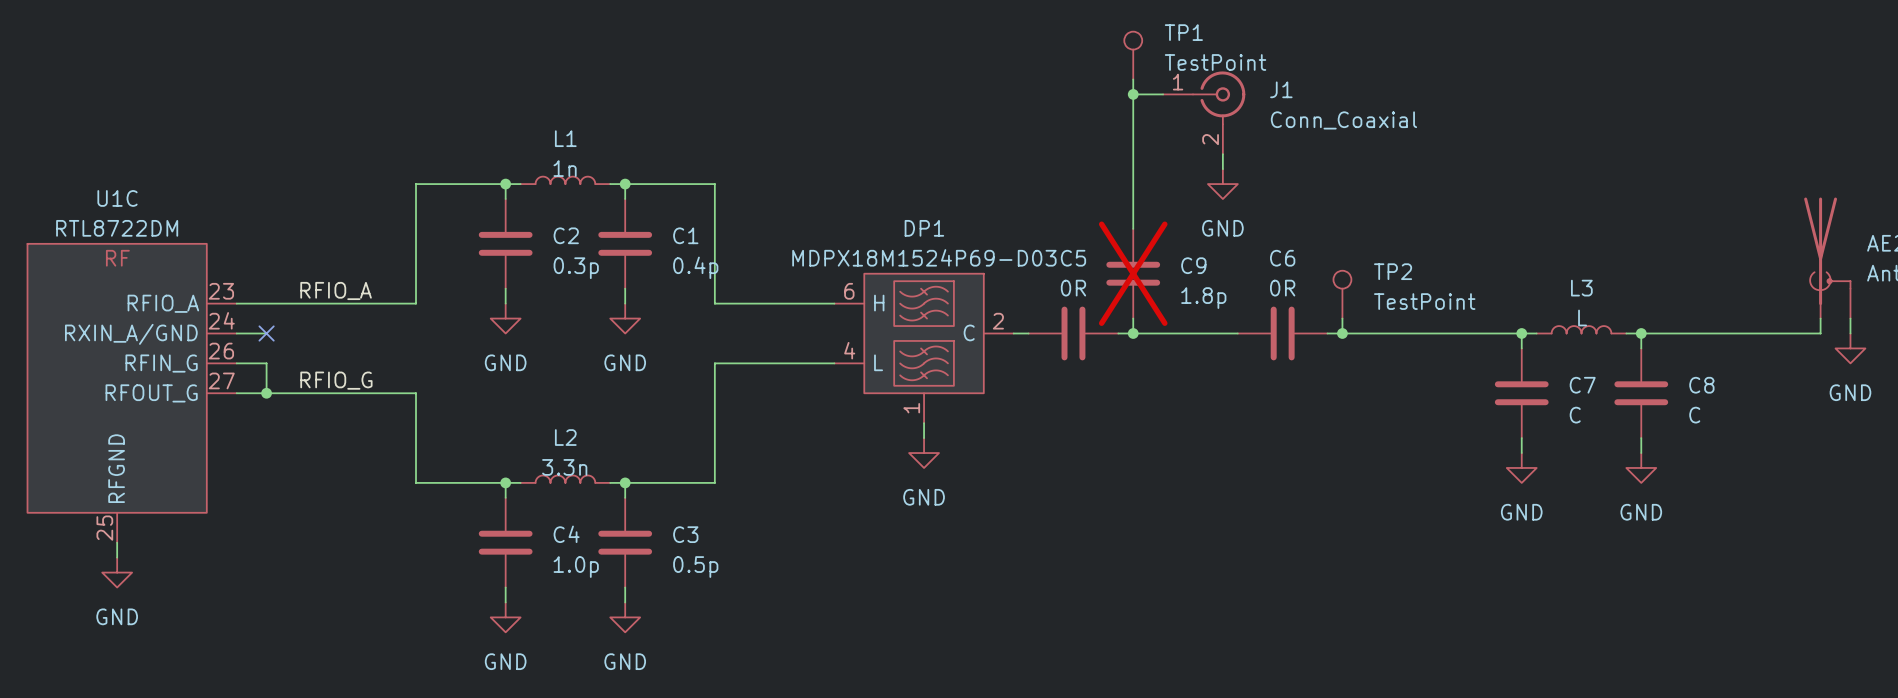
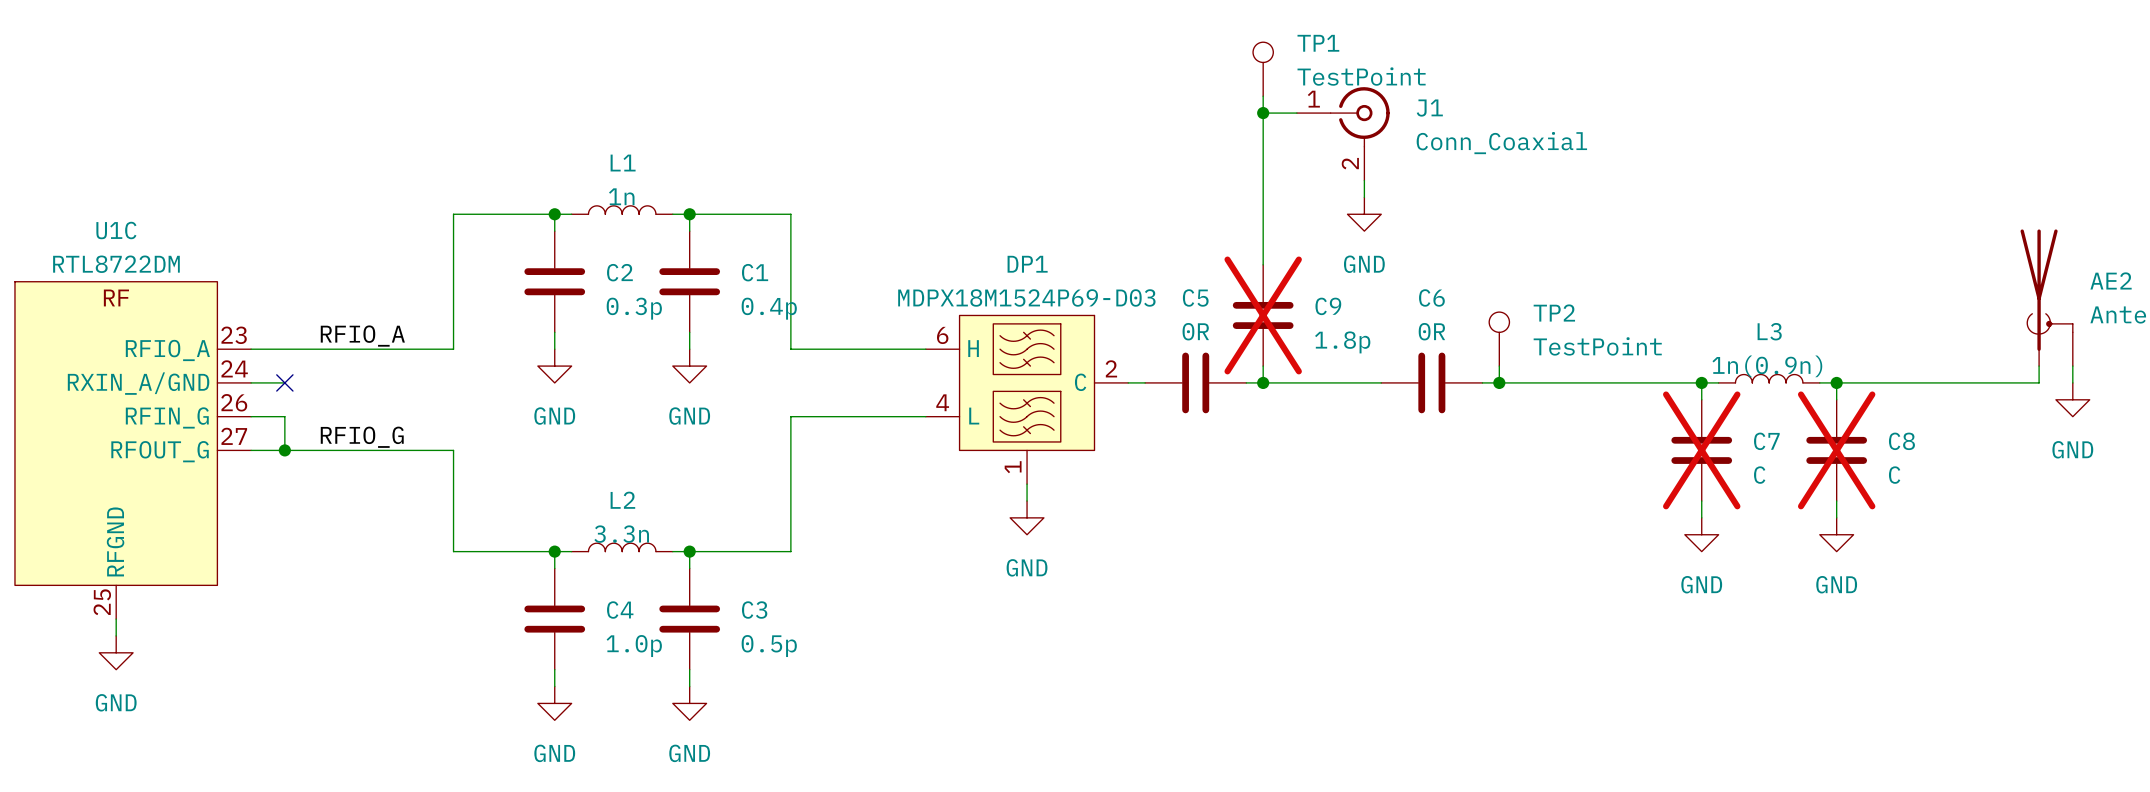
L3 value: L (1582, 317) -> 1n(0.9n) (1767, 366)
C7 do-not-place cross: none -> (1701, 450)
C8 do-not-place cross: none -> (1836, 450)

